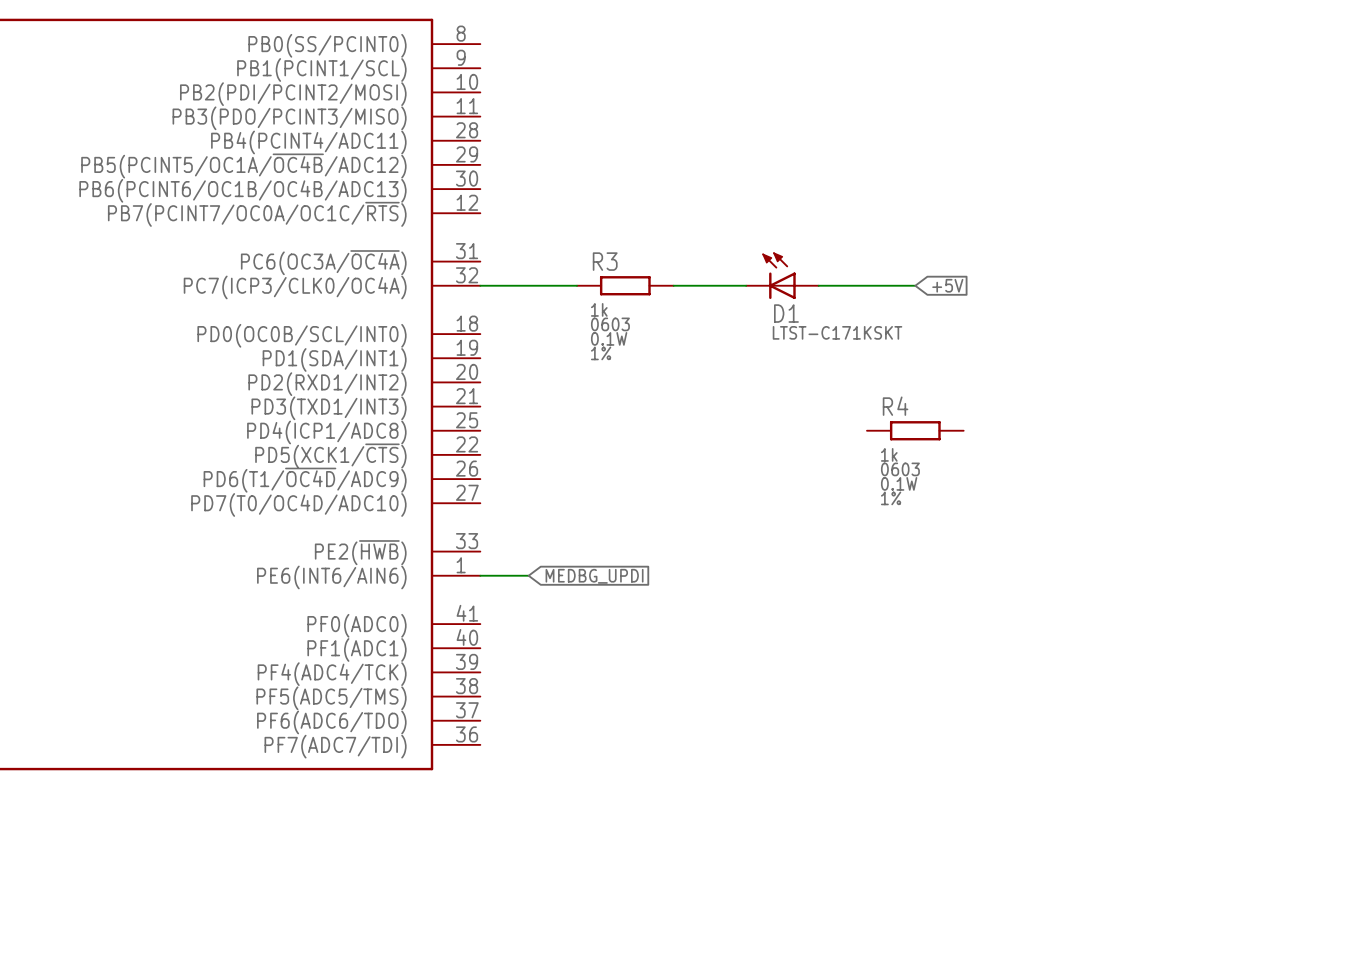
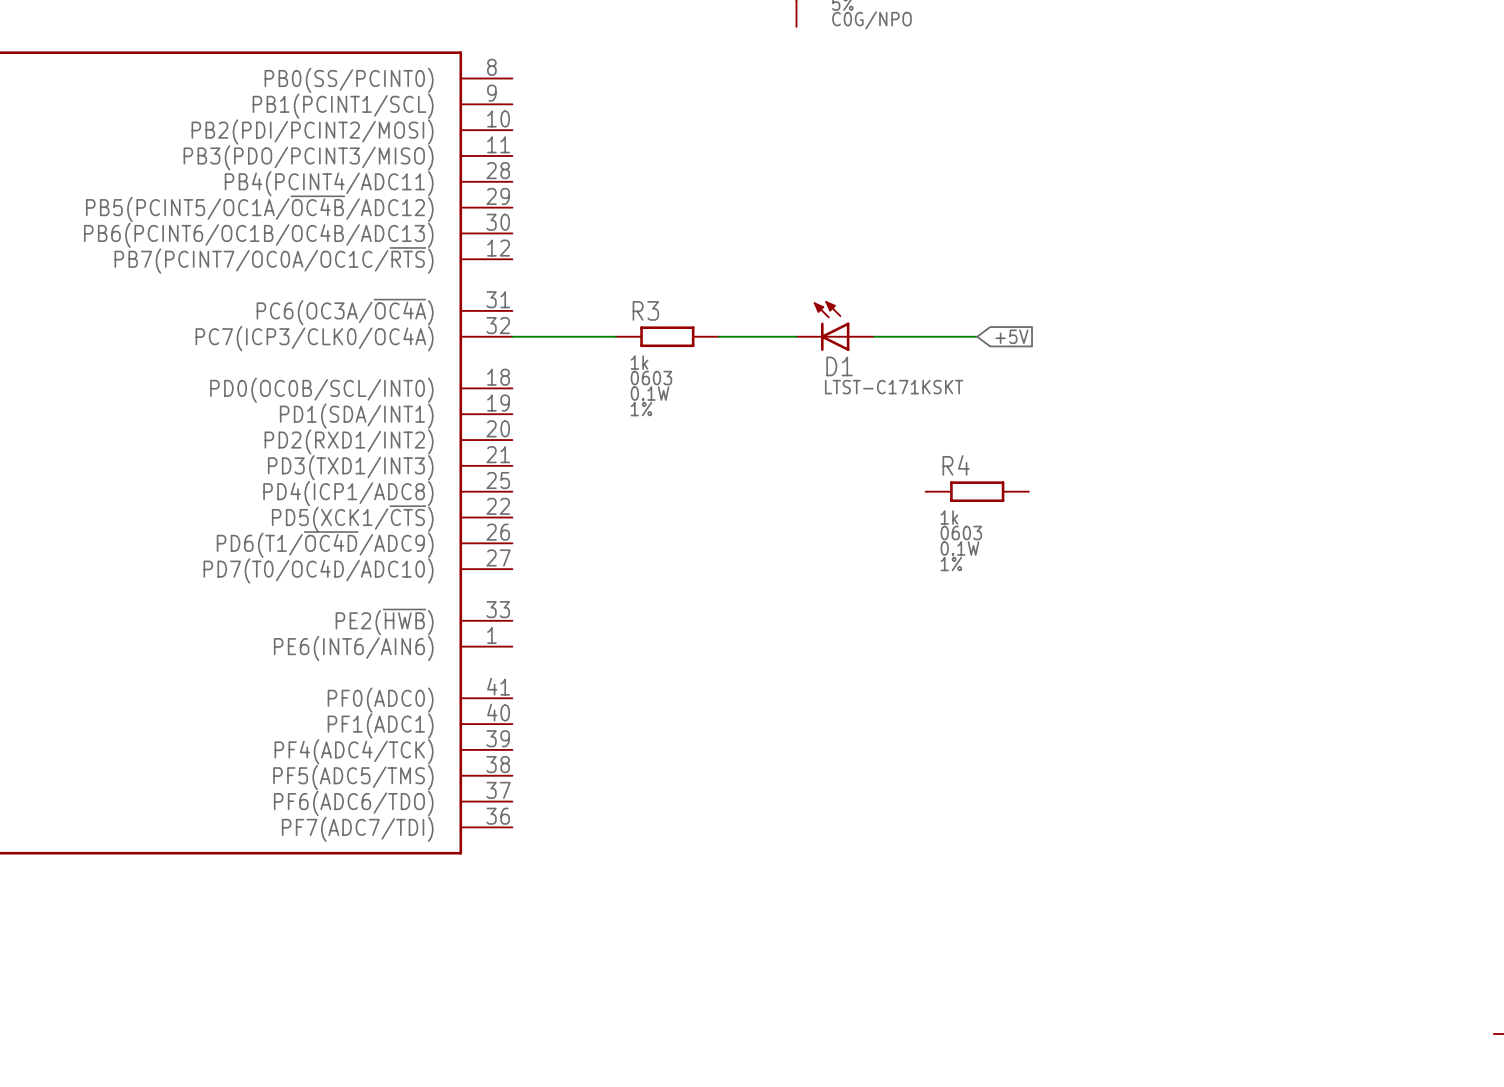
wire: (480, 575) (528, 575) -> none
global label: MEDBG_UPDI (594, 576) -> none

